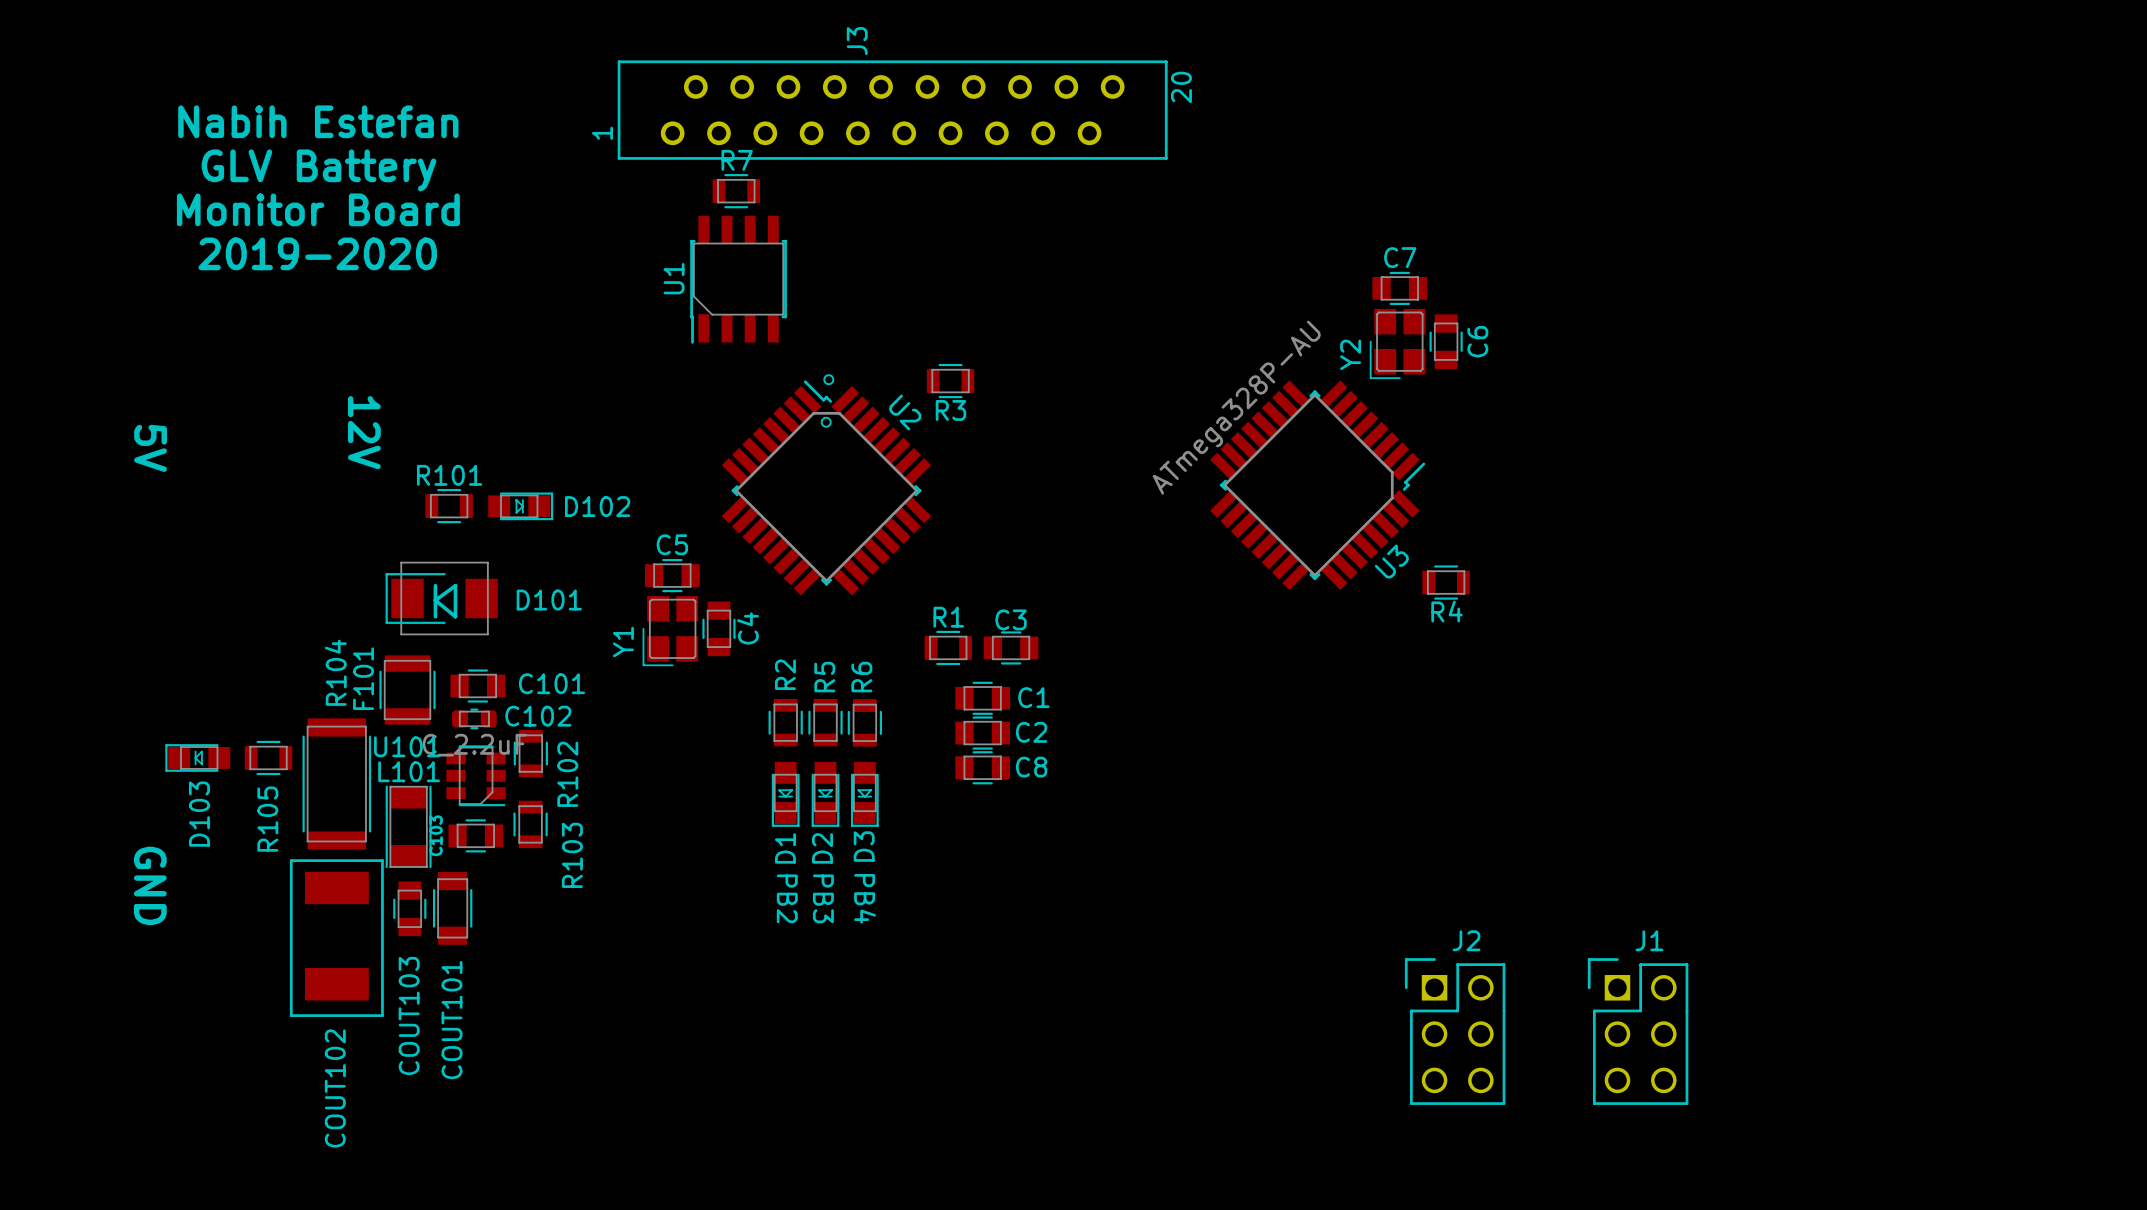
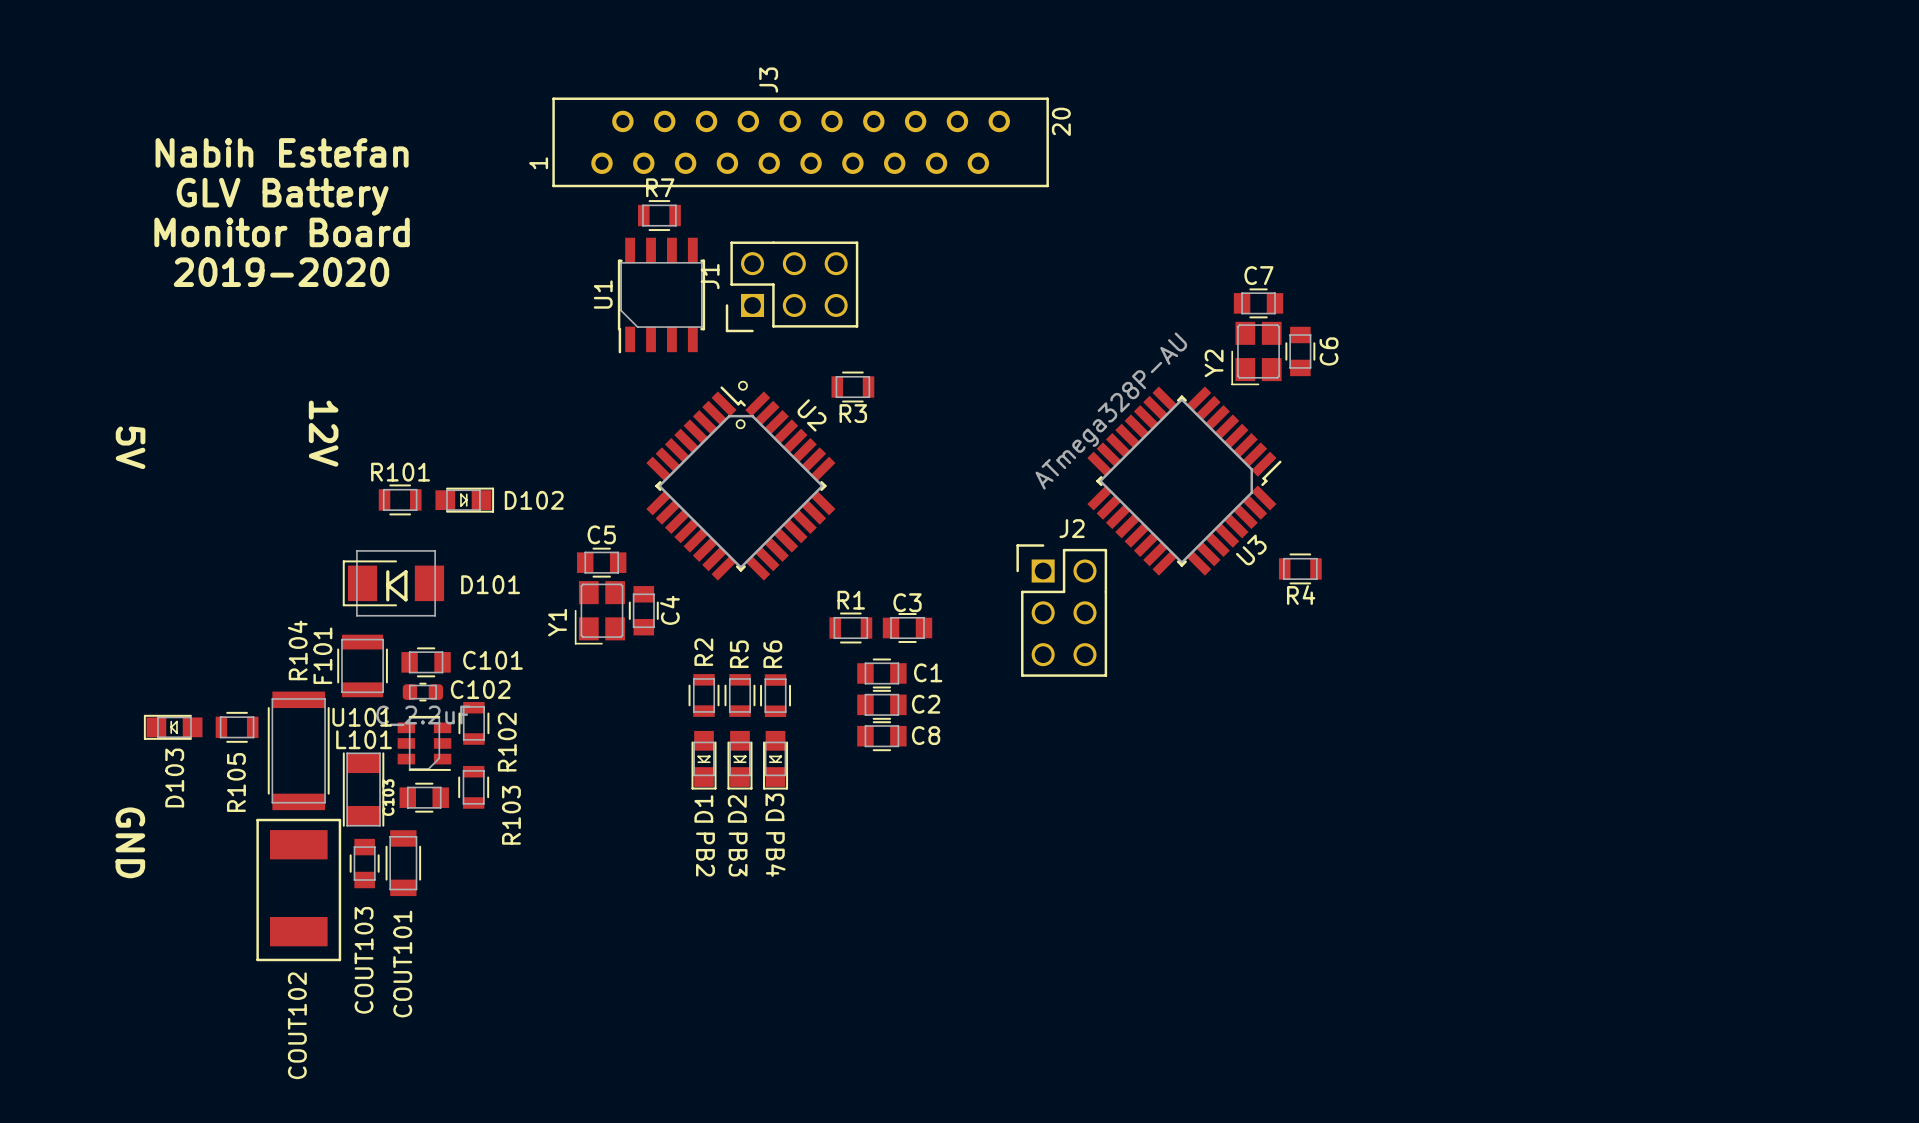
J2 position: (1455, 1031) -> (1061, 610)
J1 rotation: 0° (1638, 1031) -> 90° counterclockwise (792, 286)
J1 position: (1638, 1031) -> (792, 286)

